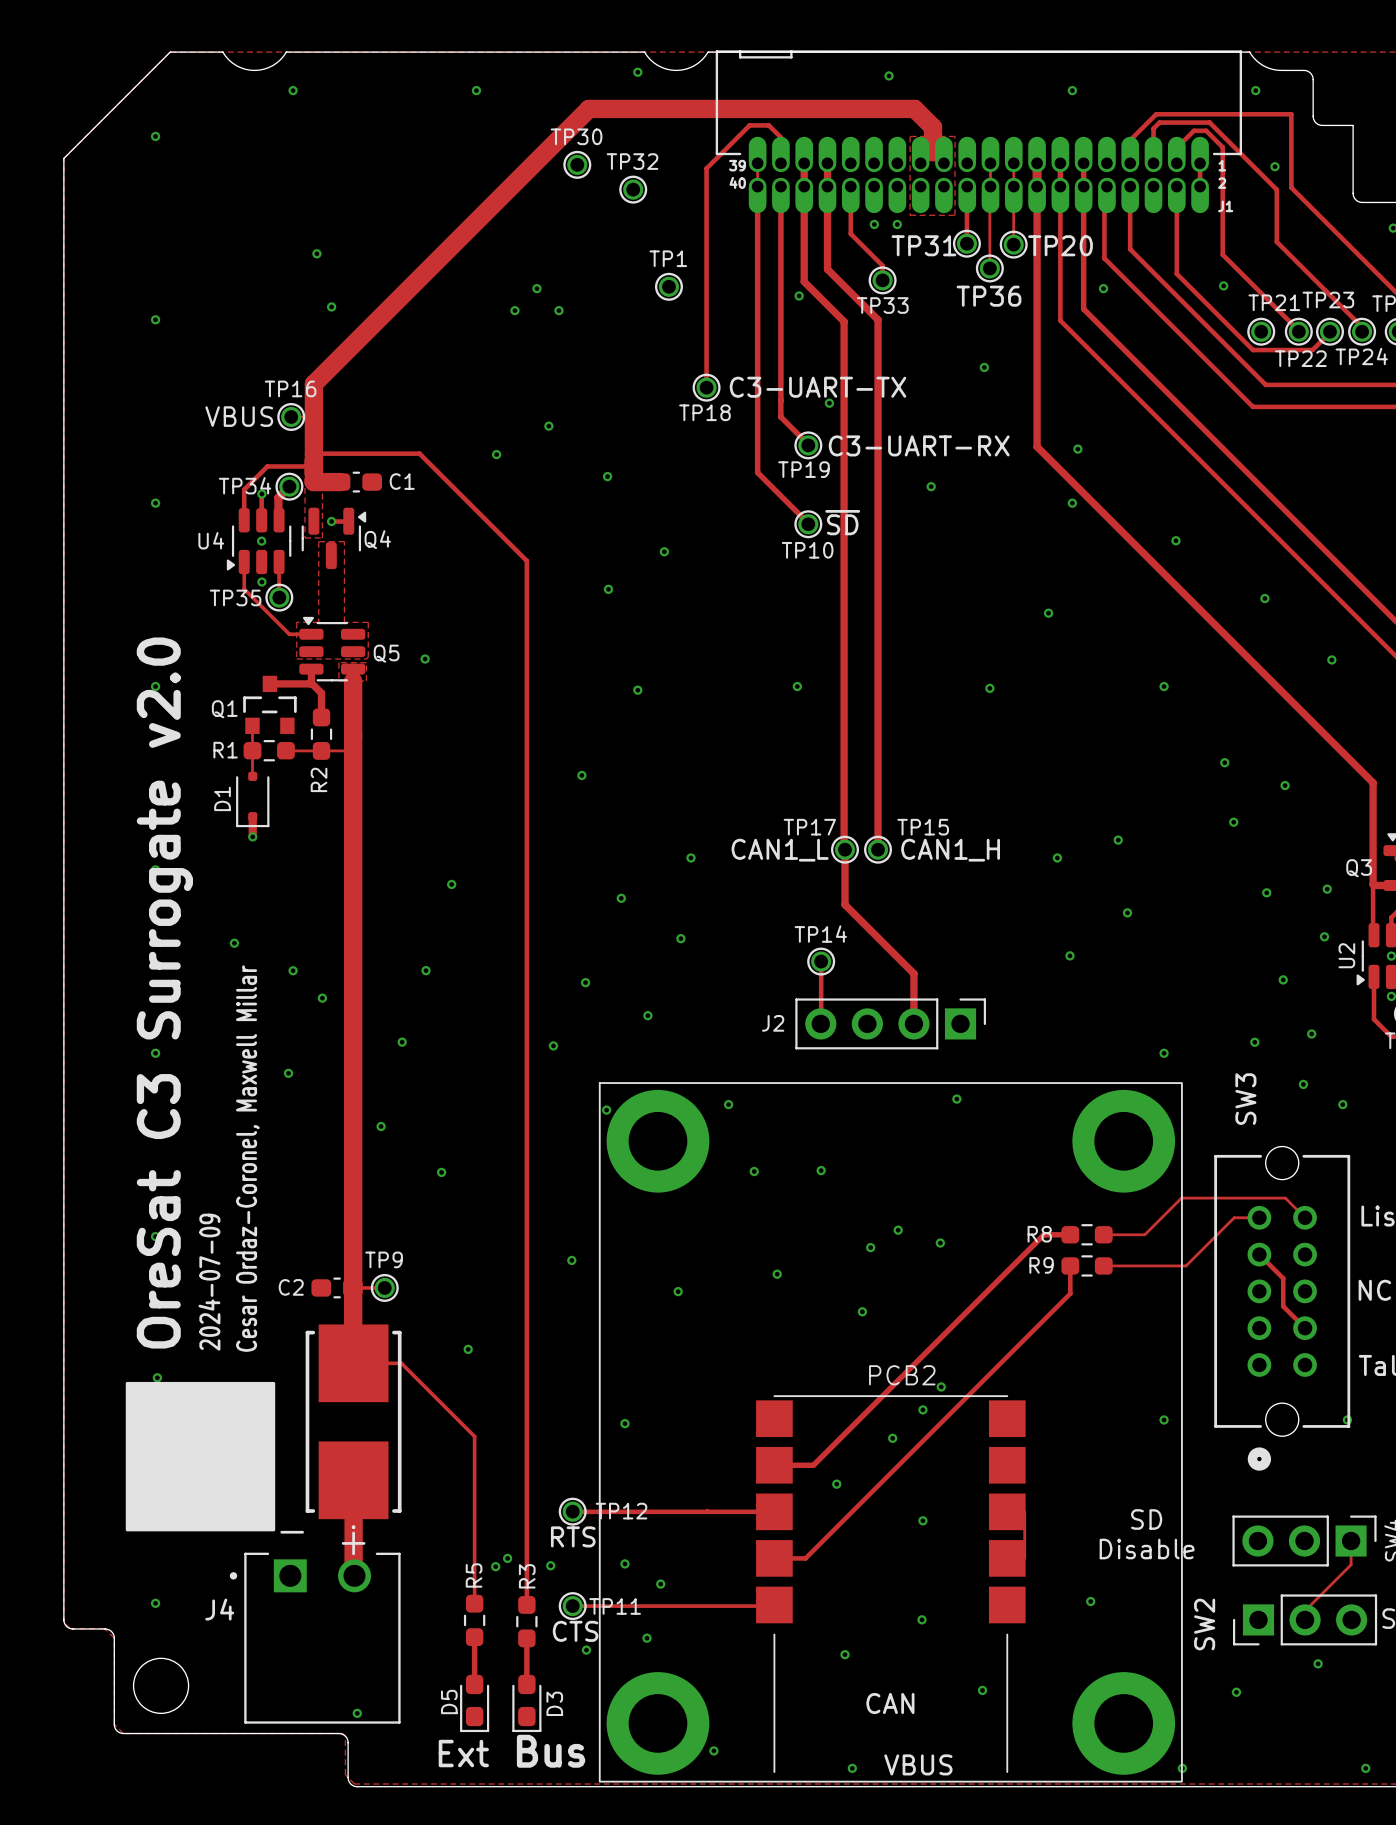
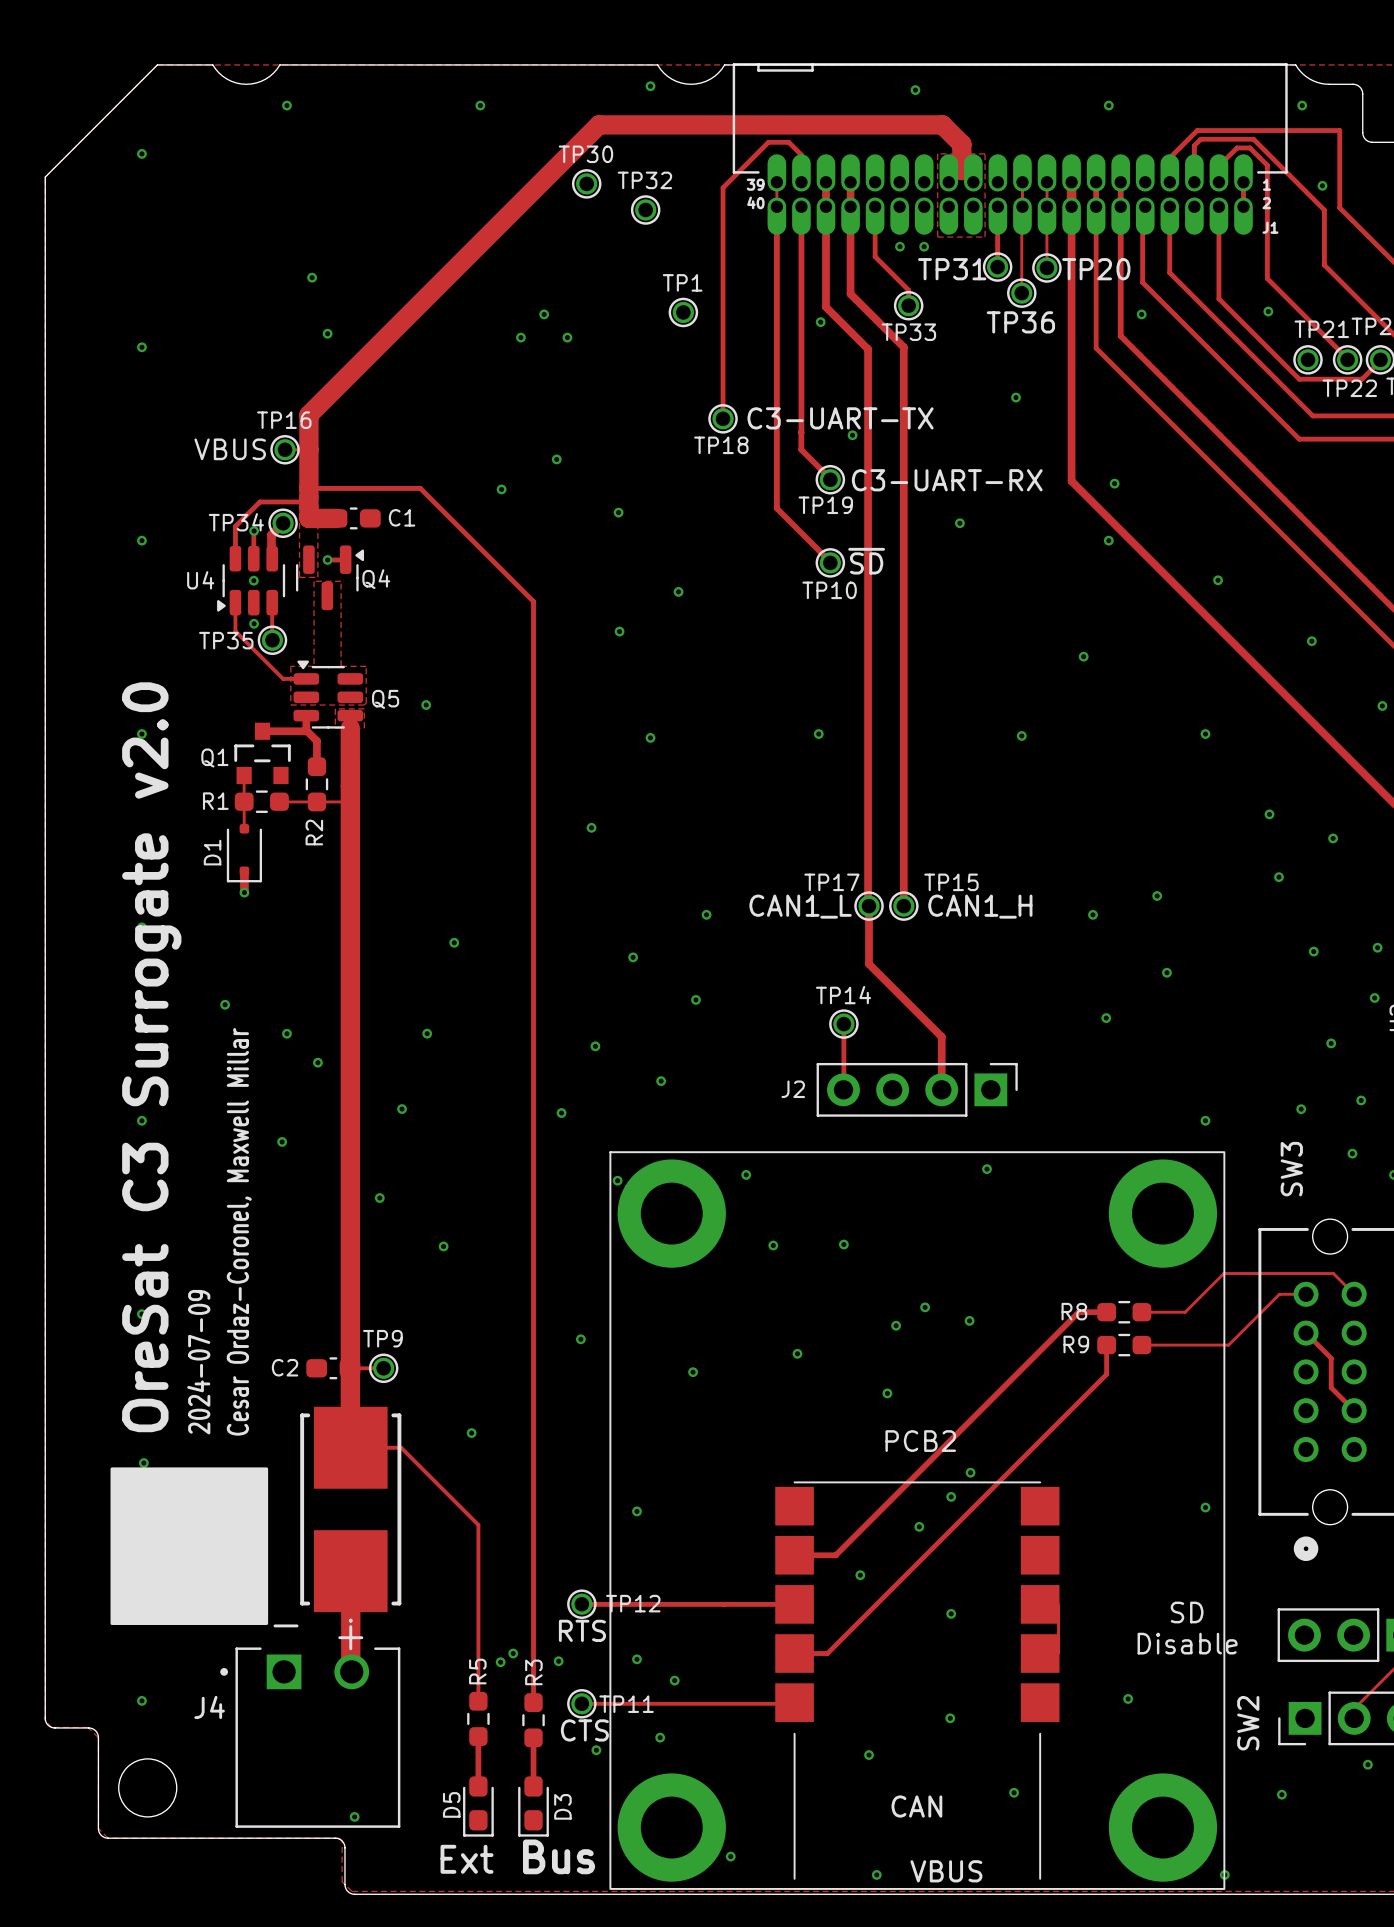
PCB2 name position: PCB2 (902, 1375) -> PCB2 (920, 1441)

